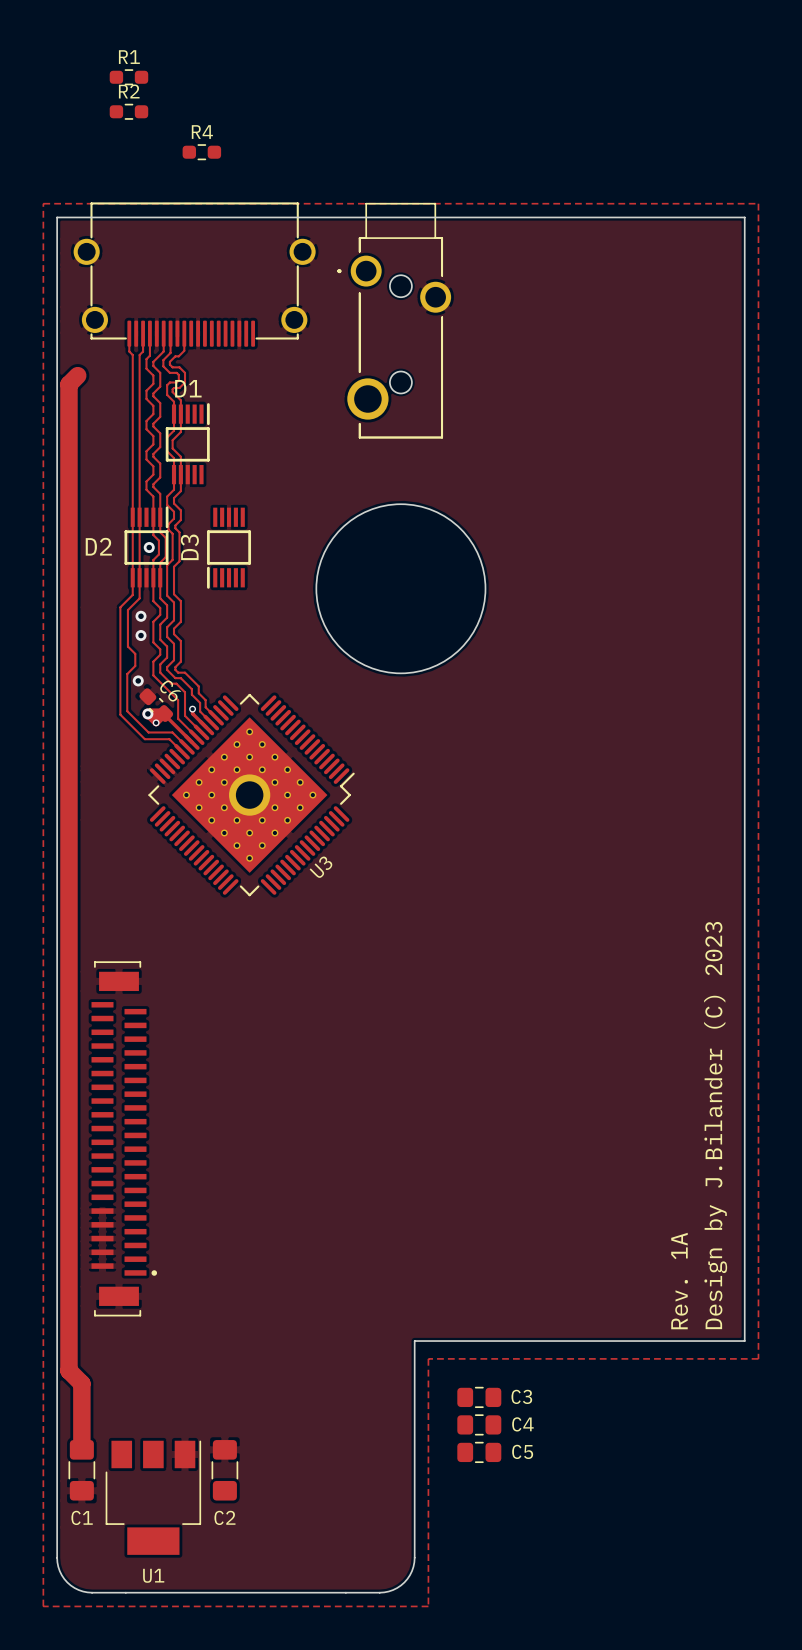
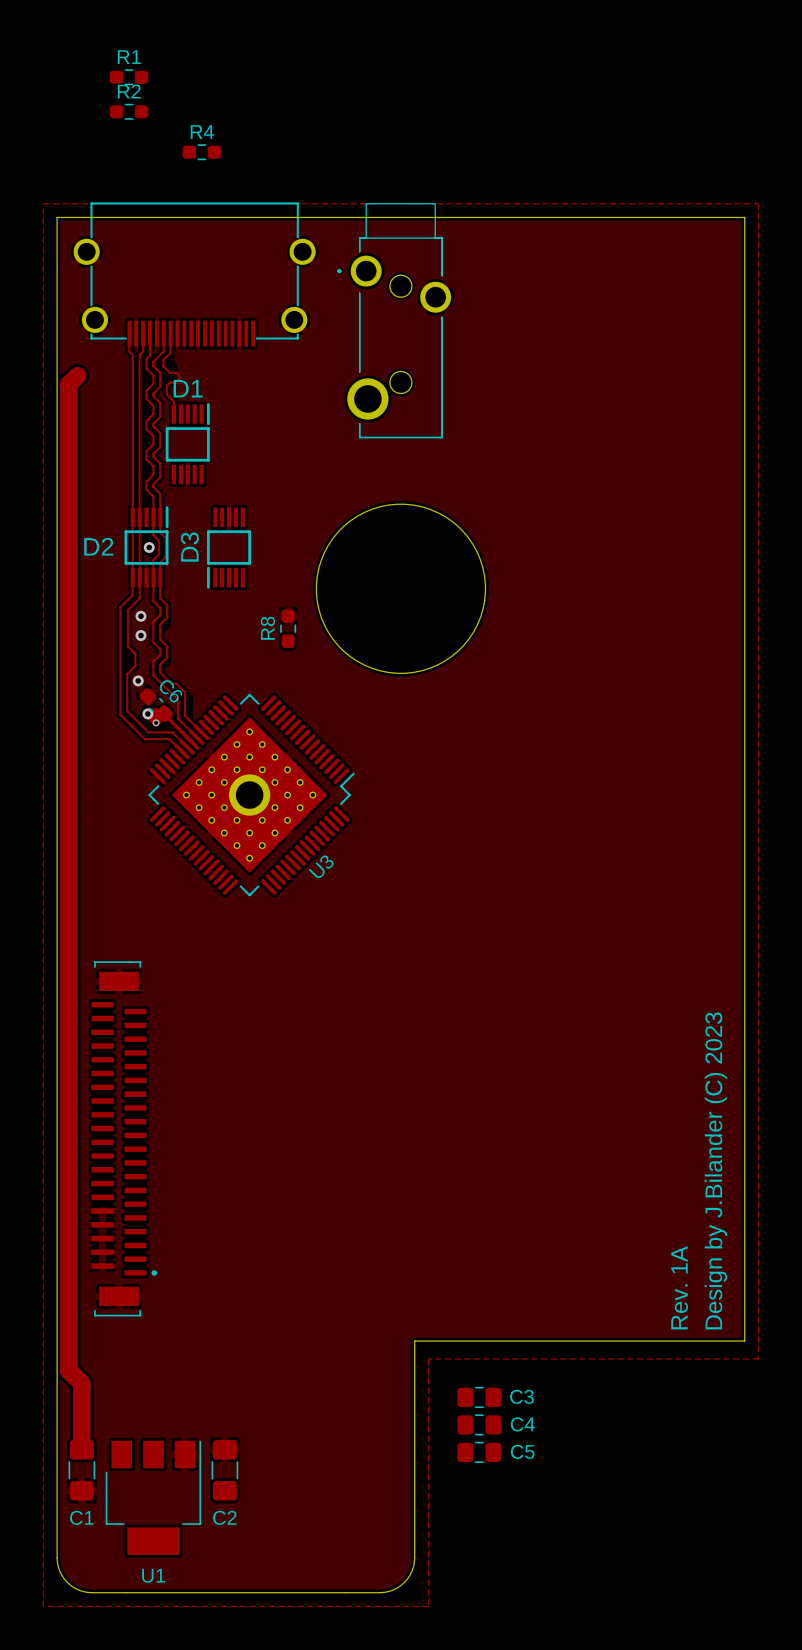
track: (184, 333) (184, 350) (169, 361) (172, 367) (179, 367) (185, 372) (185, 382) (179, 387) (172, 389) (172, 392) (180, 400) (180, 432) (172, 440) (172, 448) (180, 456) (180, 491) (174, 498) (174, 503) (180, 510) (180, 520) (175, 525) (179, 532) (179, 561) (174, 566) (174, 594) (180, 601) (180, 621) (174, 628) (174, 634) (180, 641) (180, 661) (175, 667) (175, 669) (178, 672) (185, 672) (198, 686) (198, 693) (205, 700) (205, 707) (216, 717) -> none
track: (174, 414) (174, 430) (167, 437) (167, 451) (174, 458) (174, 489) (167, 496) (167, 504) (174, 511) (174, 518) (168, 524) (168, 529) (172, 533) (172, 559) (167, 565) (167, 595) (174, 602) (174, 620) (167, 627) (167, 636) (174, 643) (174, 660) (167, 667) (167, 669) (175, 678) (180, 678) (191, 689) (191, 694) (200, 702) (200, 711) (211, 722) -> none
R8: none -> (288, 628)
track: (192, 709) (192, 713) (206, 727) -> none
via: (192, 709) -> none

